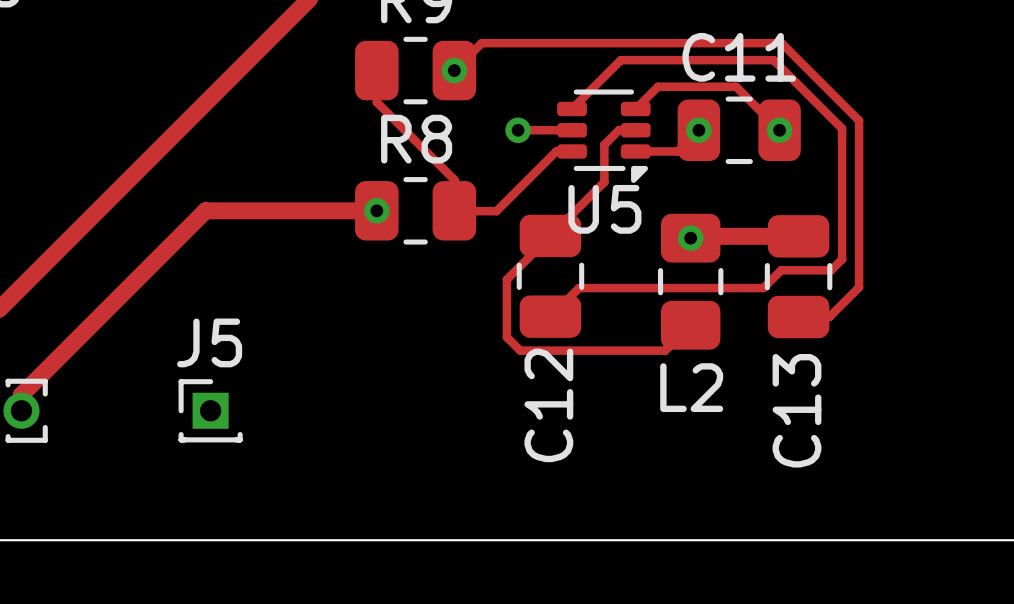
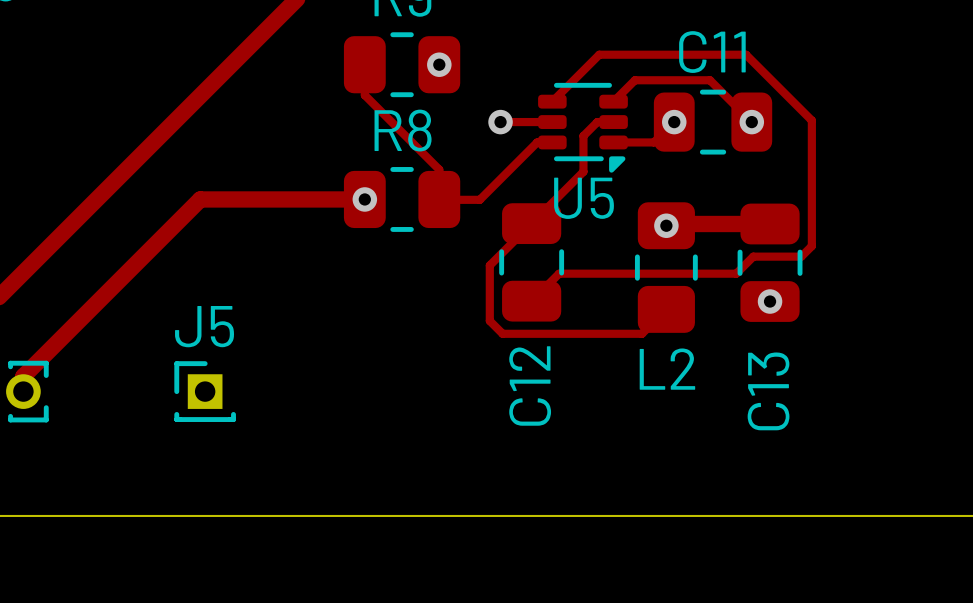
track: (454, 70) (481, 43) (781, 43) (859, 120) (859, 287) (829, 317) (798, 317) -> none
via: none -> (770, 301)

